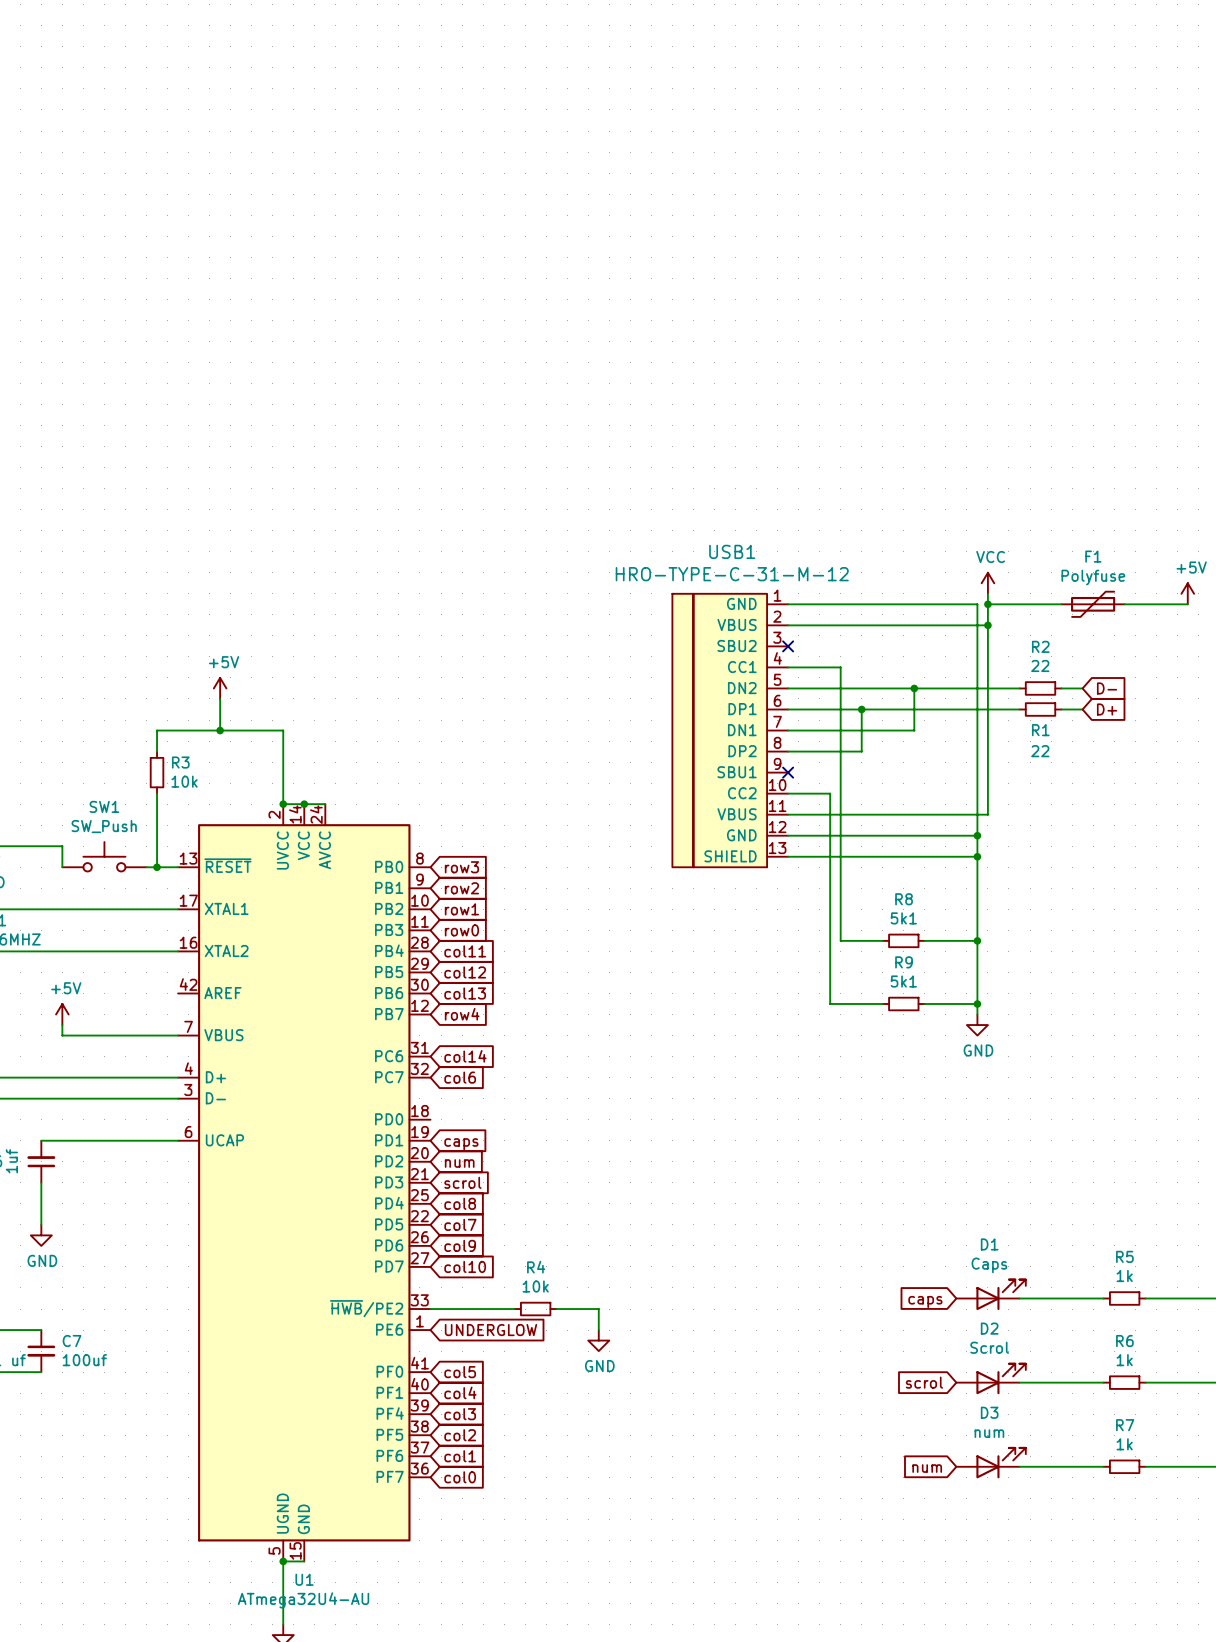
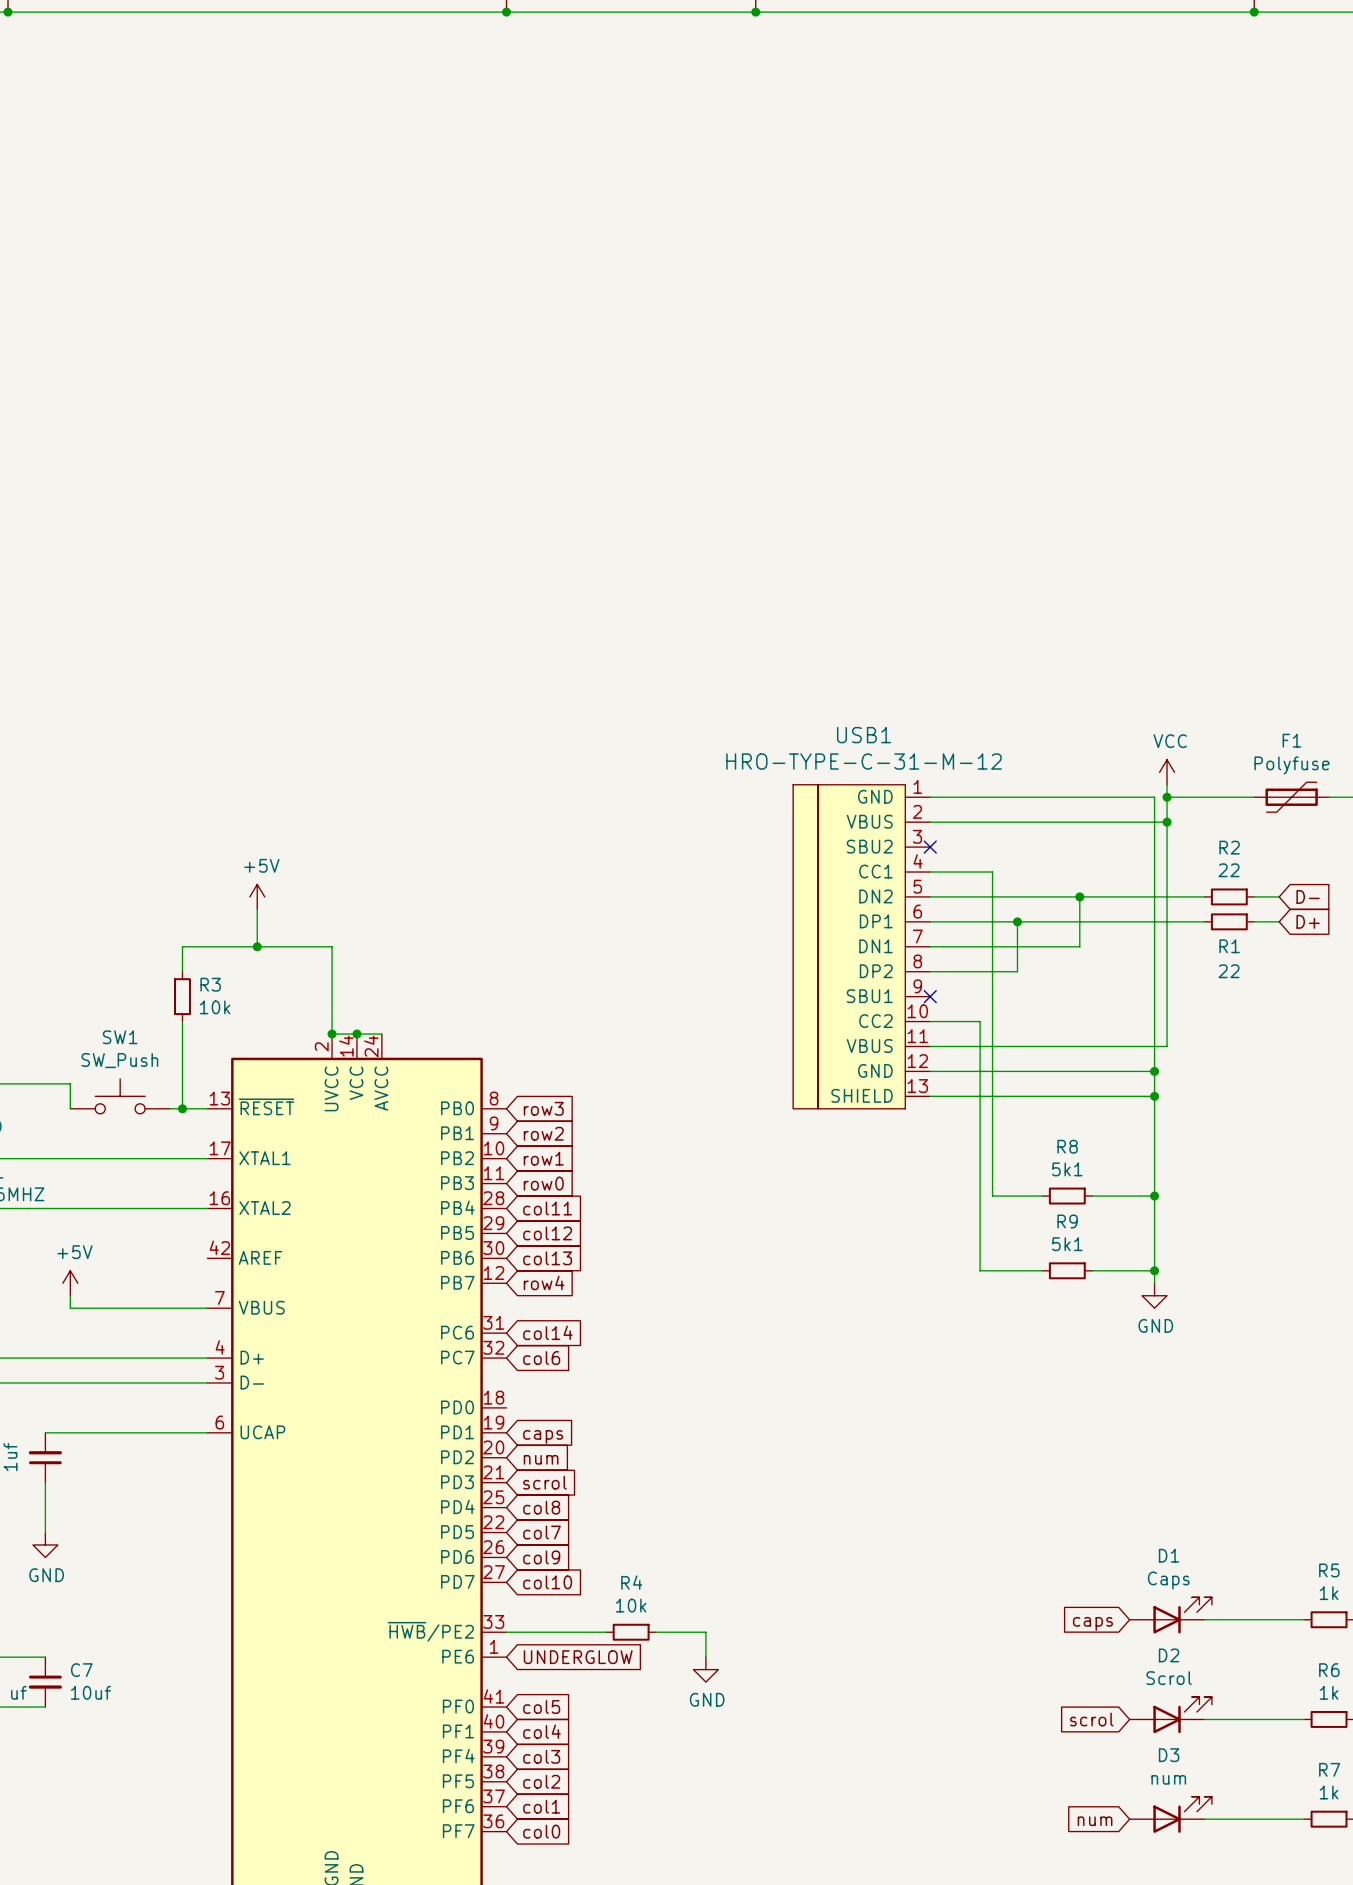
C7 value: 100uf (84, 1360) -> 10uf (90, 1692)

